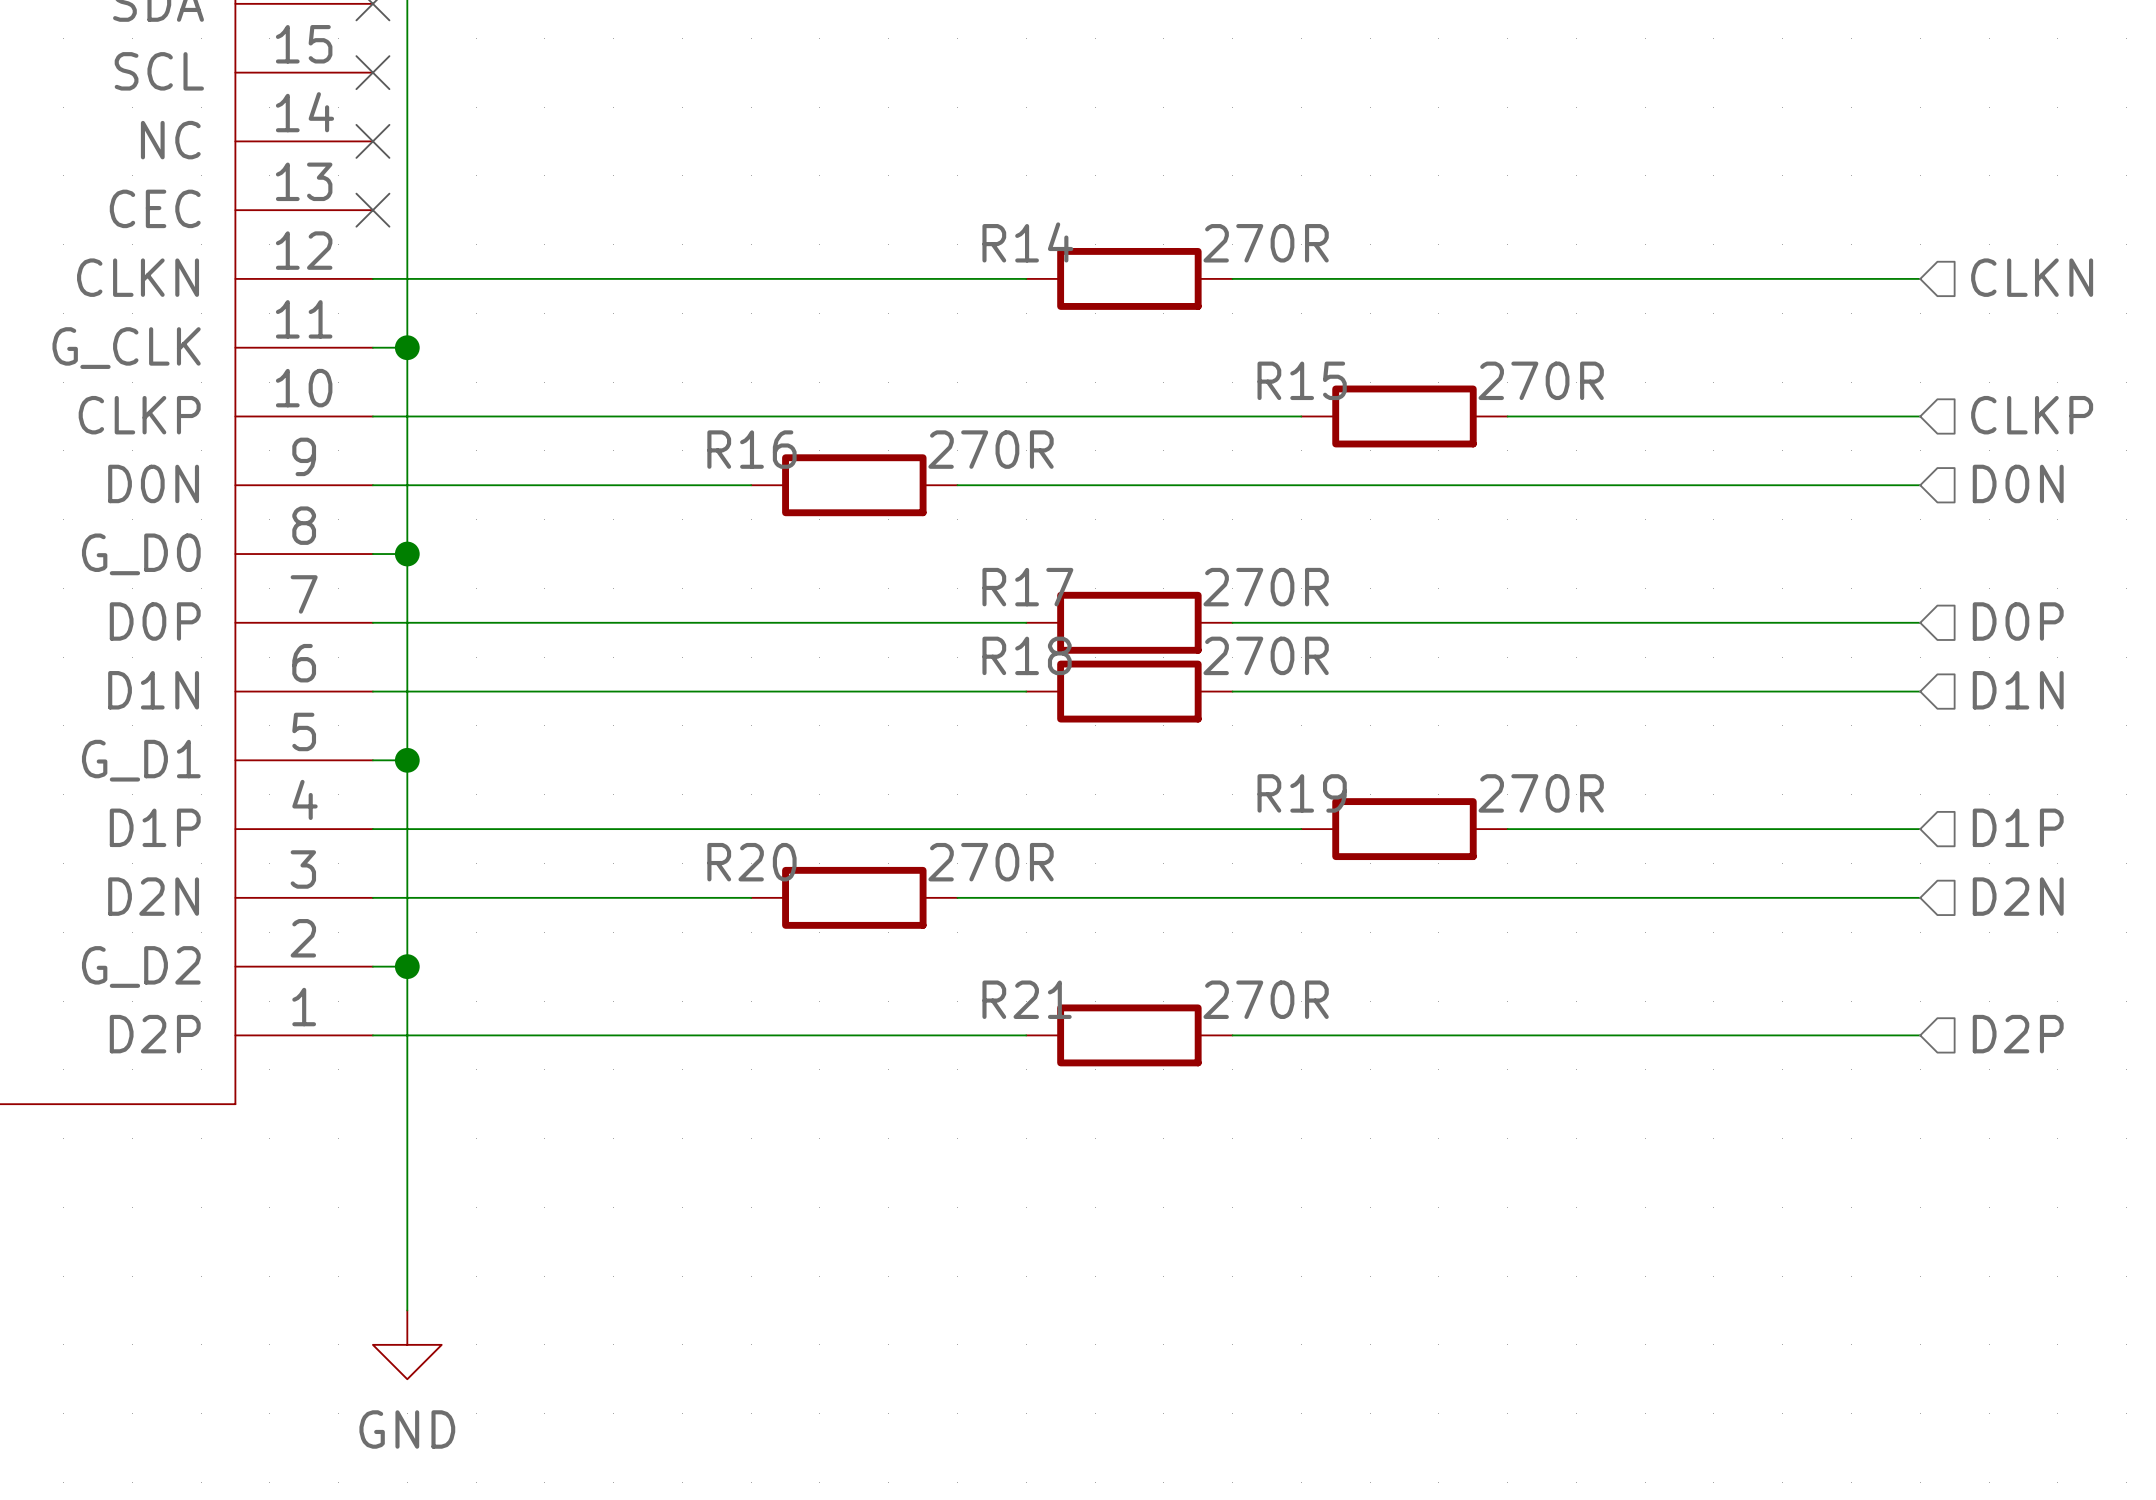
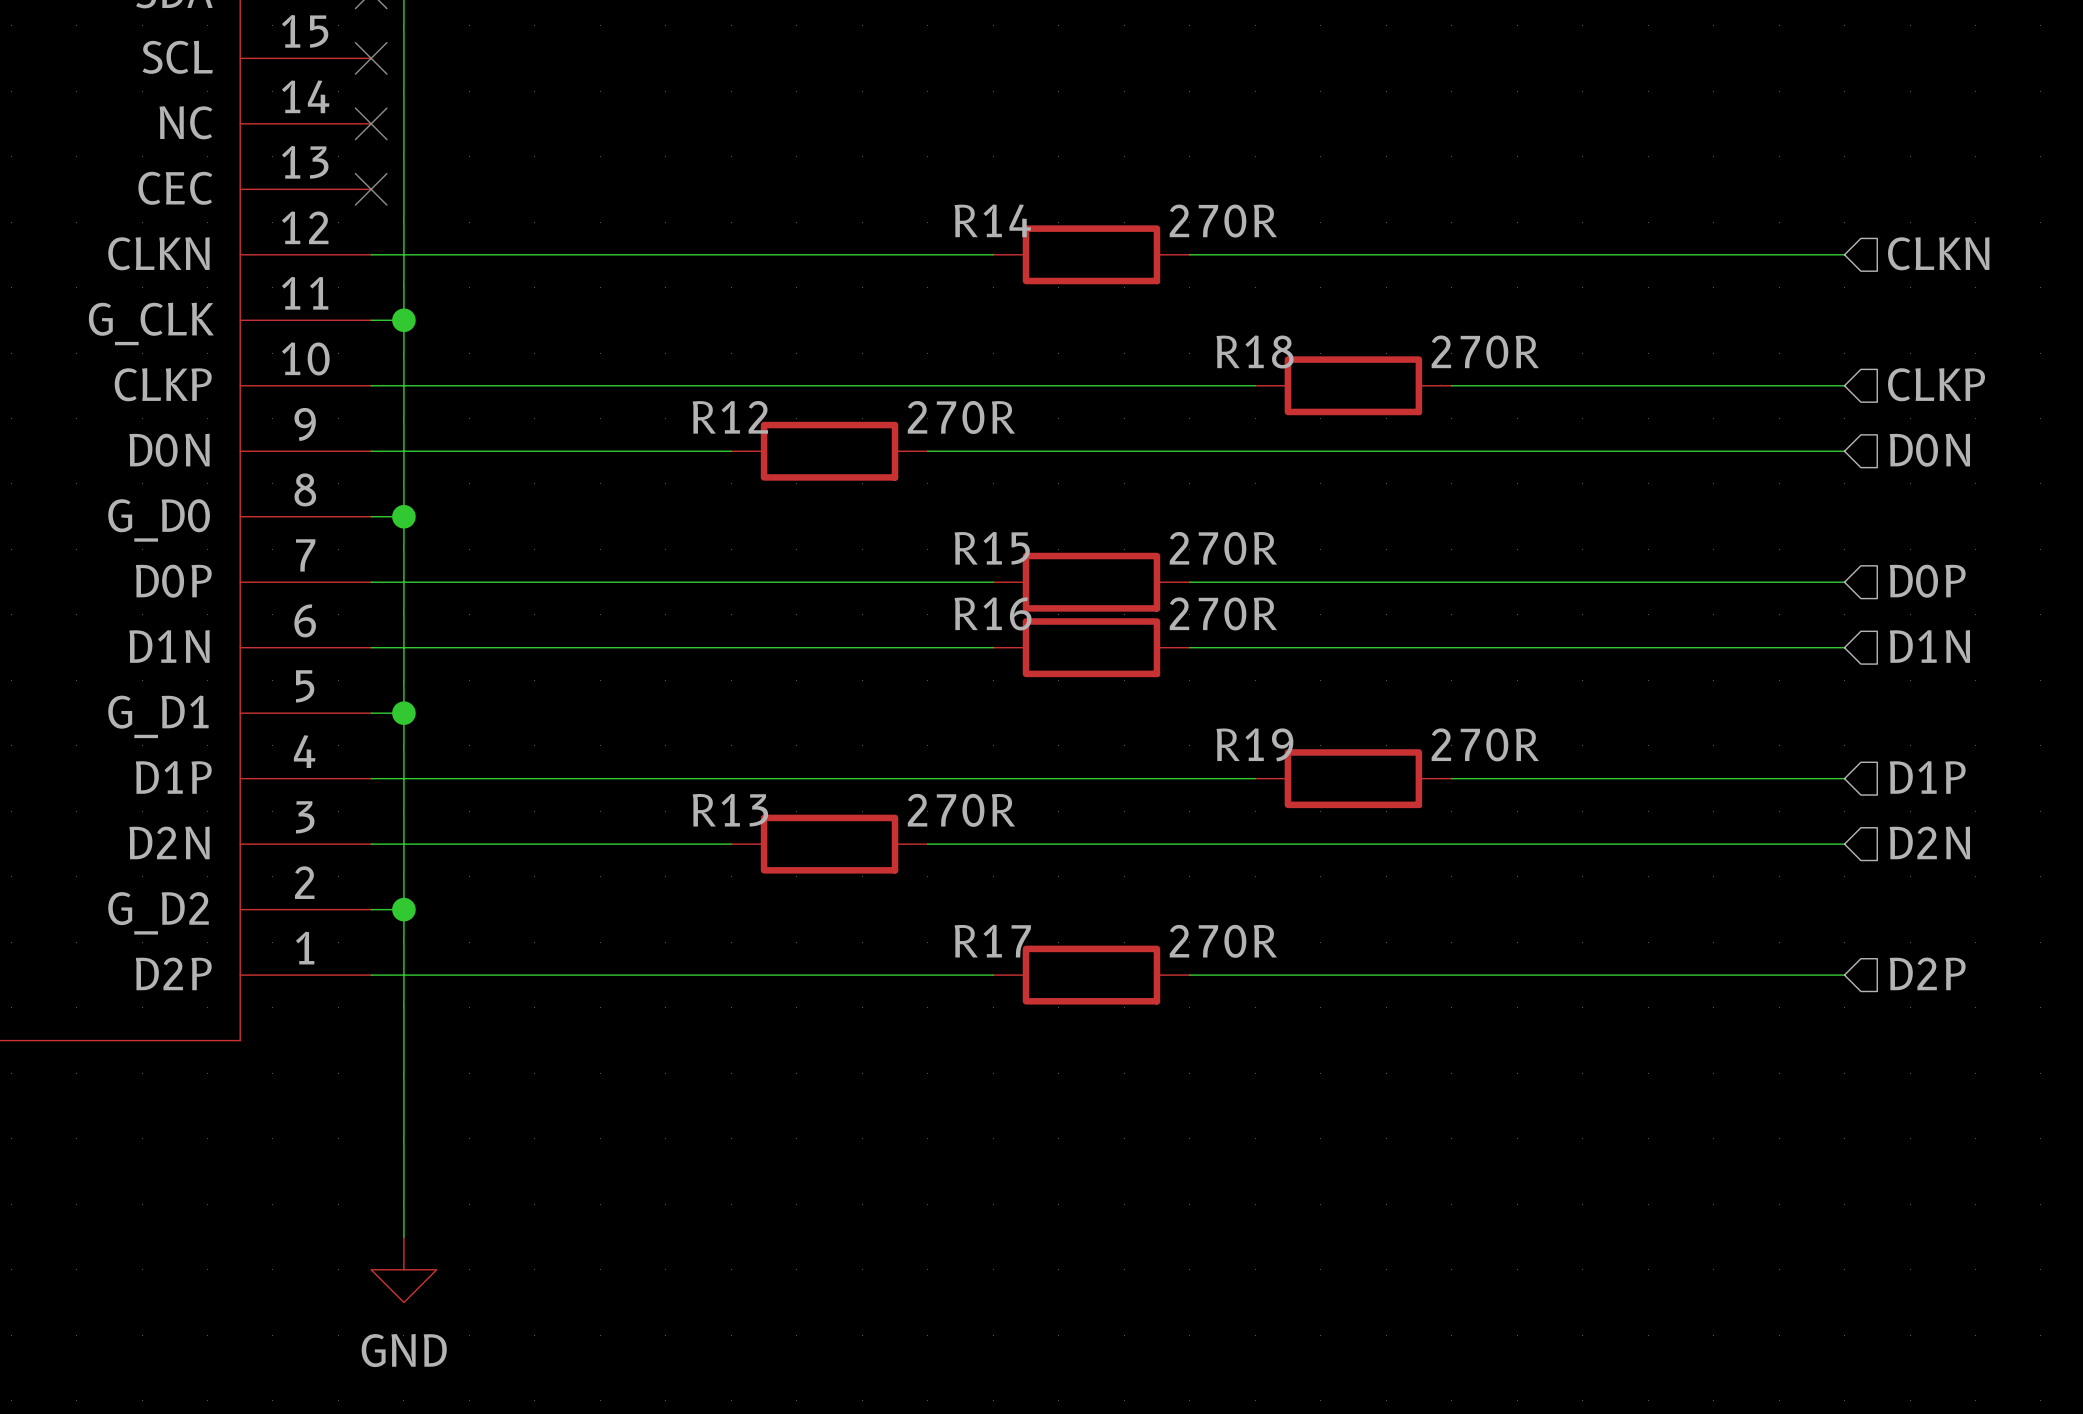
R15 name: R15 (1302, 380) -> R18 (1255, 351)
R16 name: R16 (751, 449) -> R12 (730, 417)
R17 name: R17 (1027, 587) -> R15 (992, 548)
R18 name: R18 (1027, 655) -> R16 (993, 613)
R20 name: R20 (751, 862) -> R13 (730, 810)
R21 name: R21 (1027, 999) -> R17 (992, 941)

